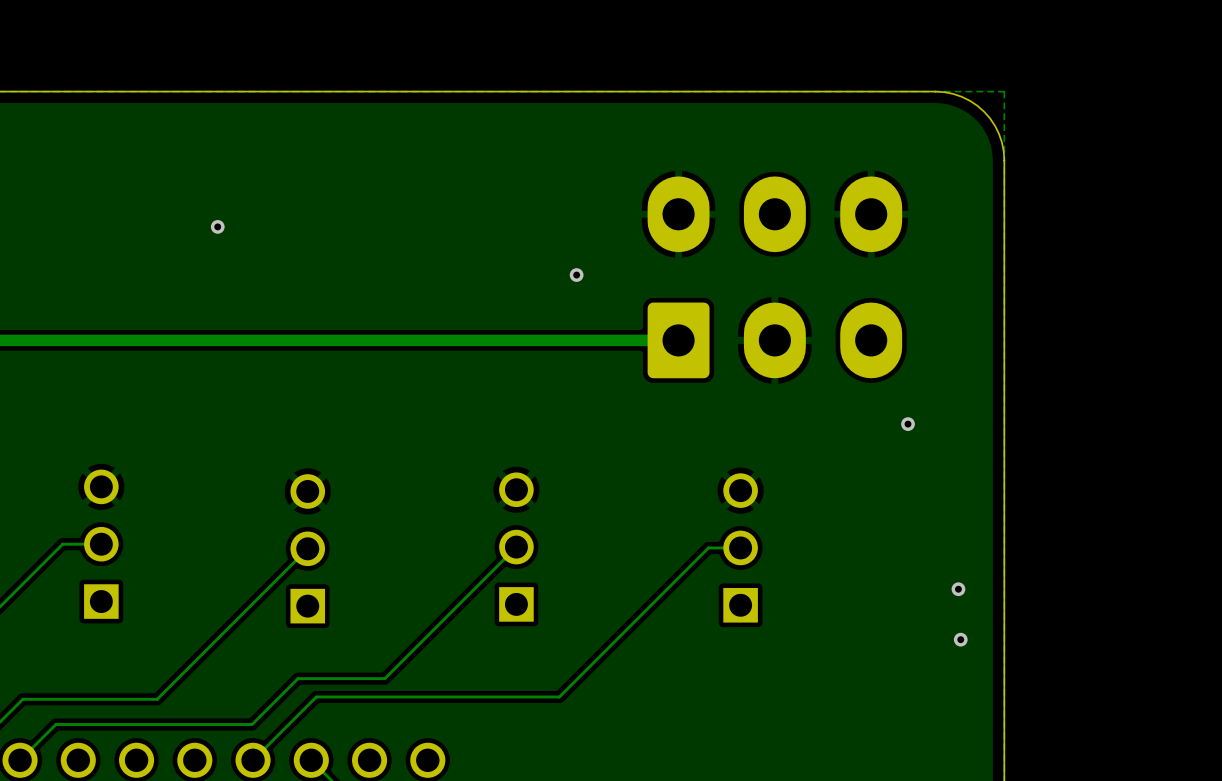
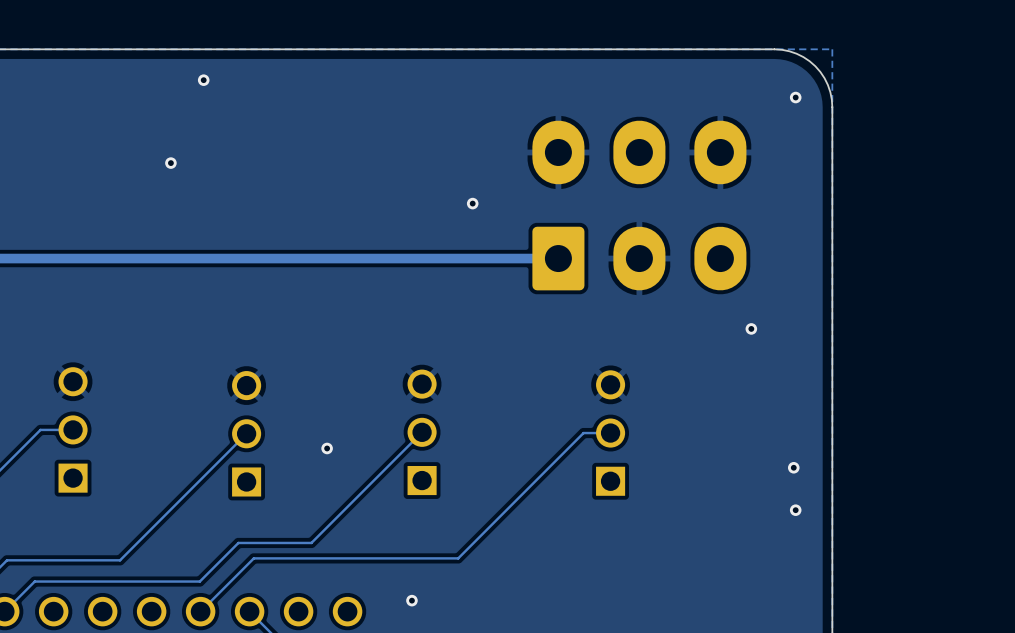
via: none -> (203, 80)
via: none -> (795, 97)
via: none -> (327, 448)
via: none -> (411, 600)

